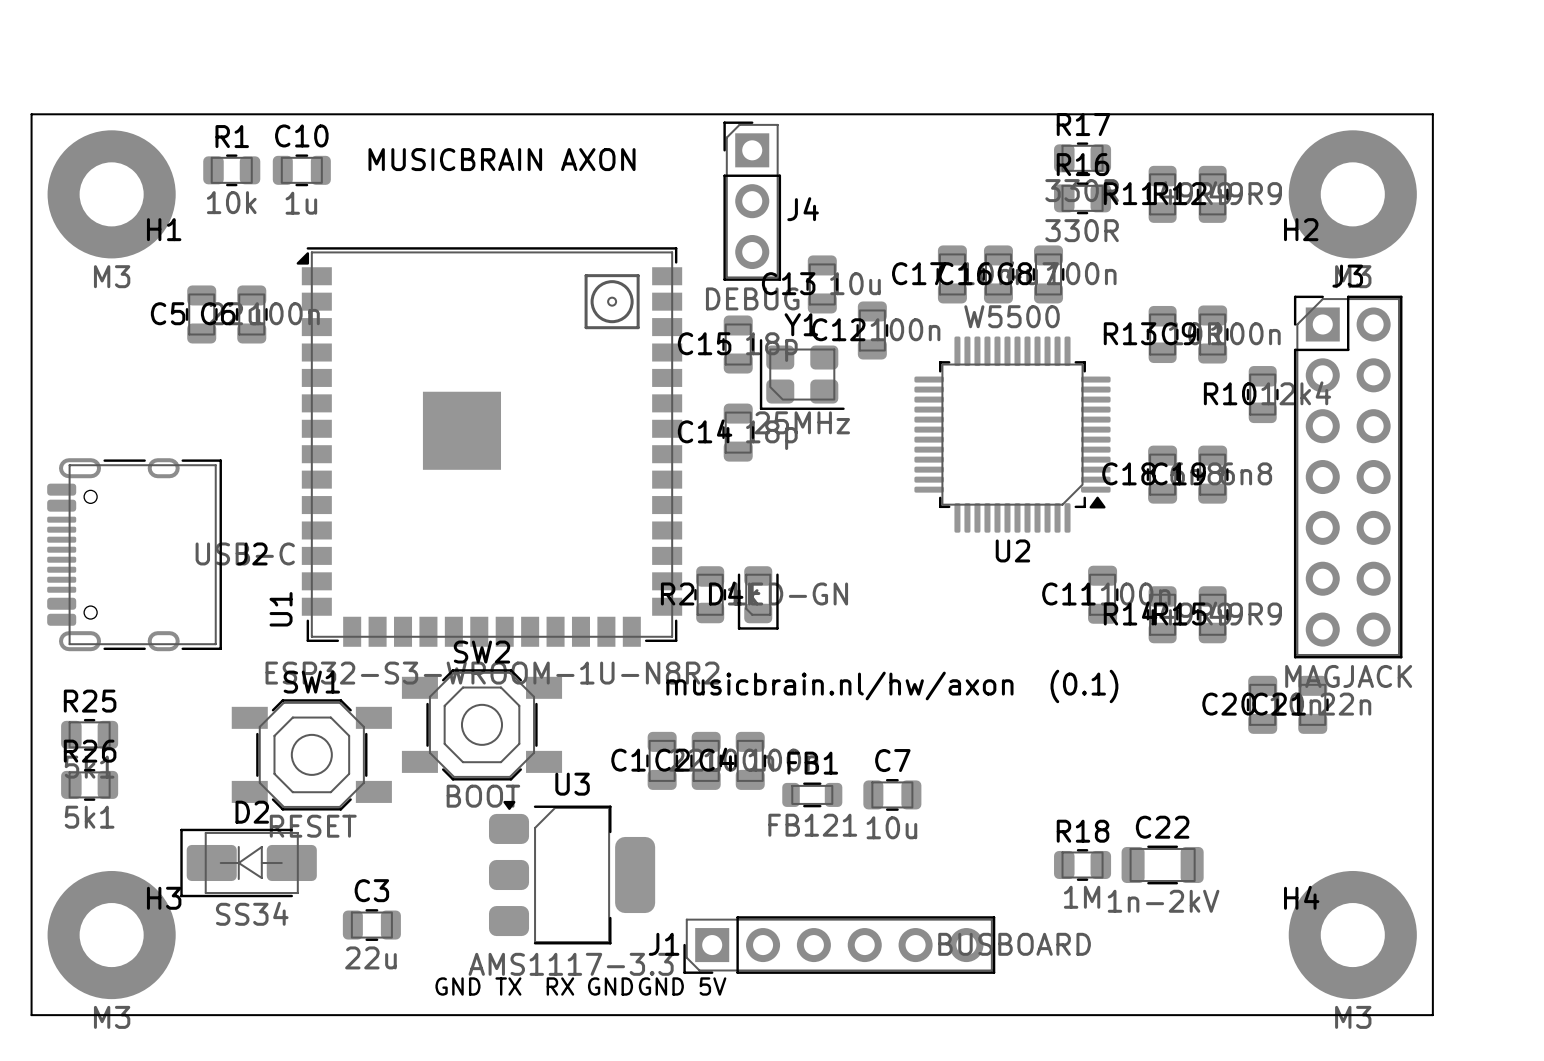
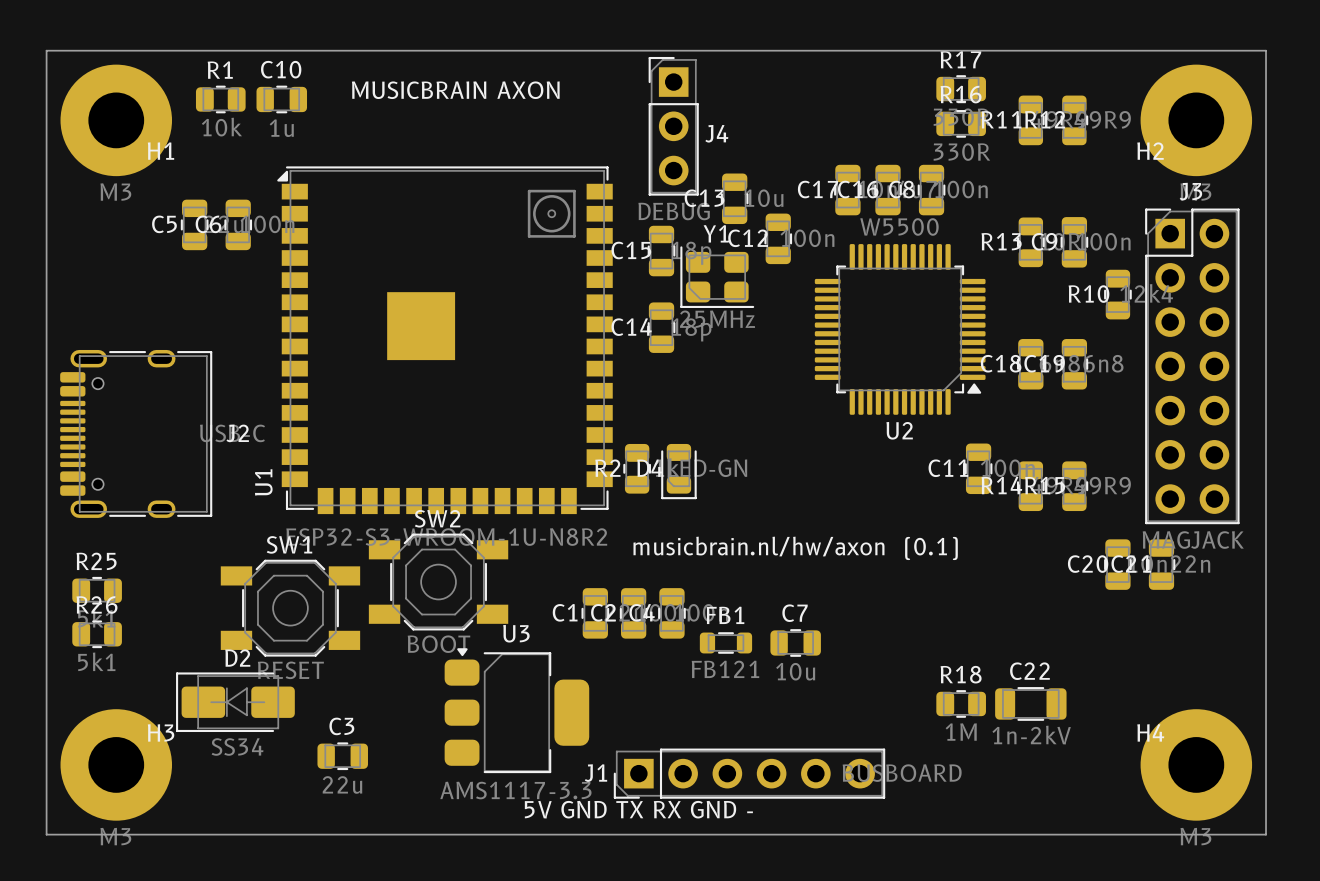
text: GND (457, 986) -> none
text: TX (508, 986) -> none
text: RX (560, 986) -> none
text: GND (610, 986) -> none
text: GND (661, 986) -> none
text: 5V (712, 986) -> 5V GND TX RX GND - (638, 809)

